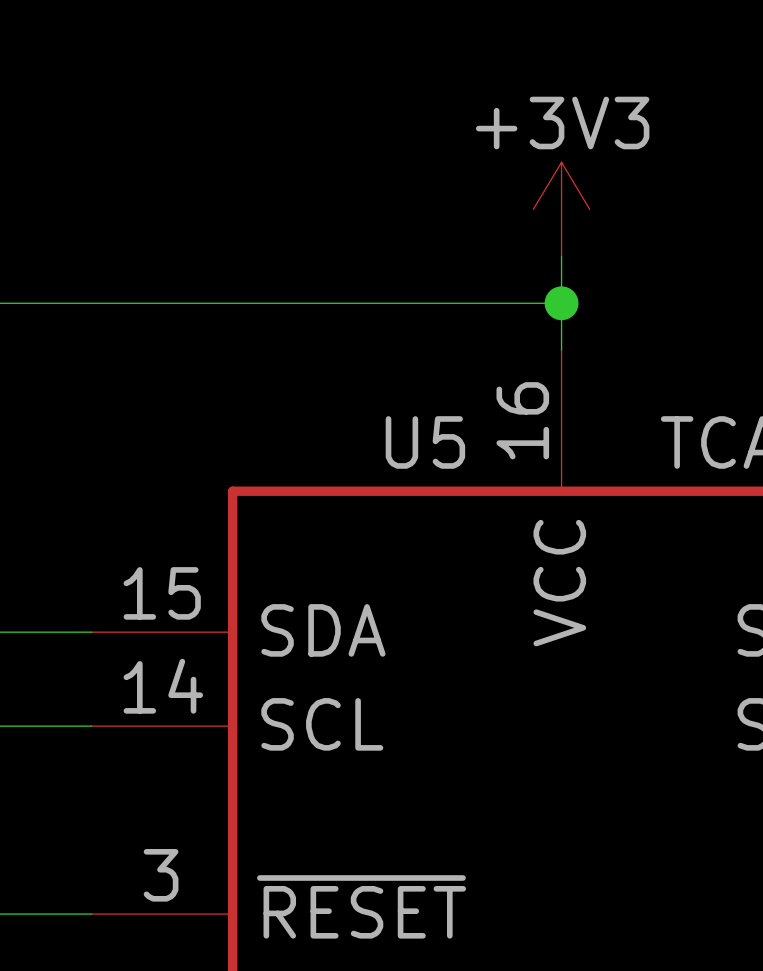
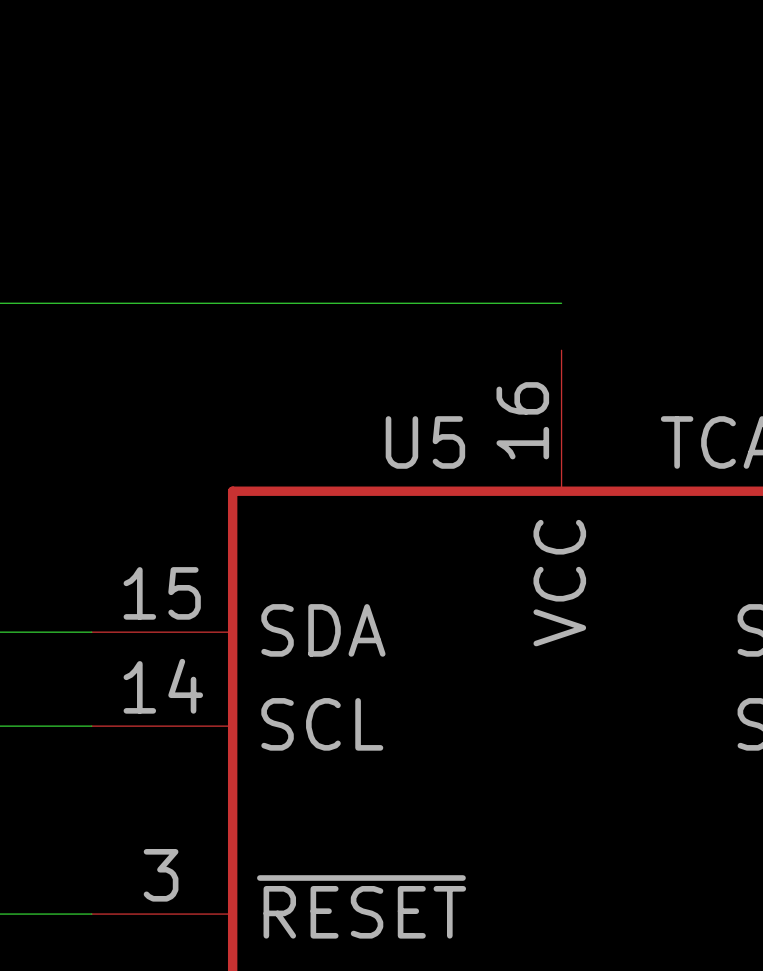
power symbol: +3V3 (561, 209) -> none
wire: (561, 256) (561, 350) -> none
junction: (561, 303) -> none

